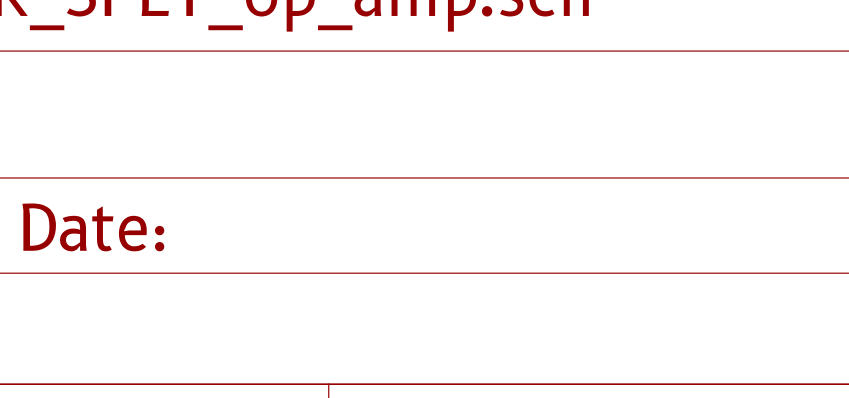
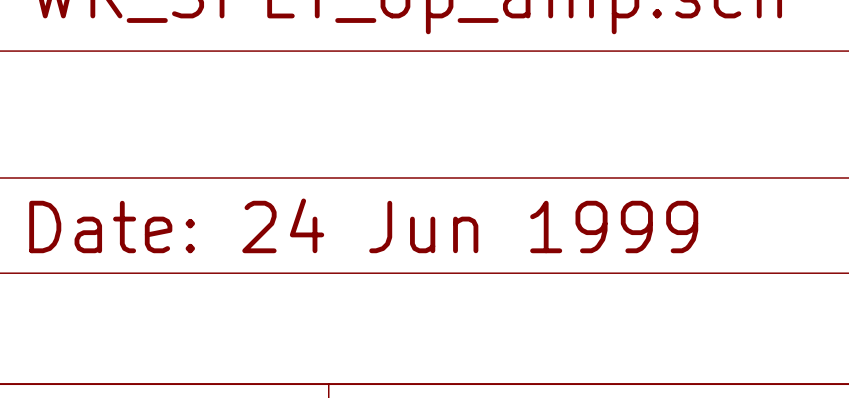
title block: Date: (93, 227) -> Date: 24 Jun 1999 (363, 225)

